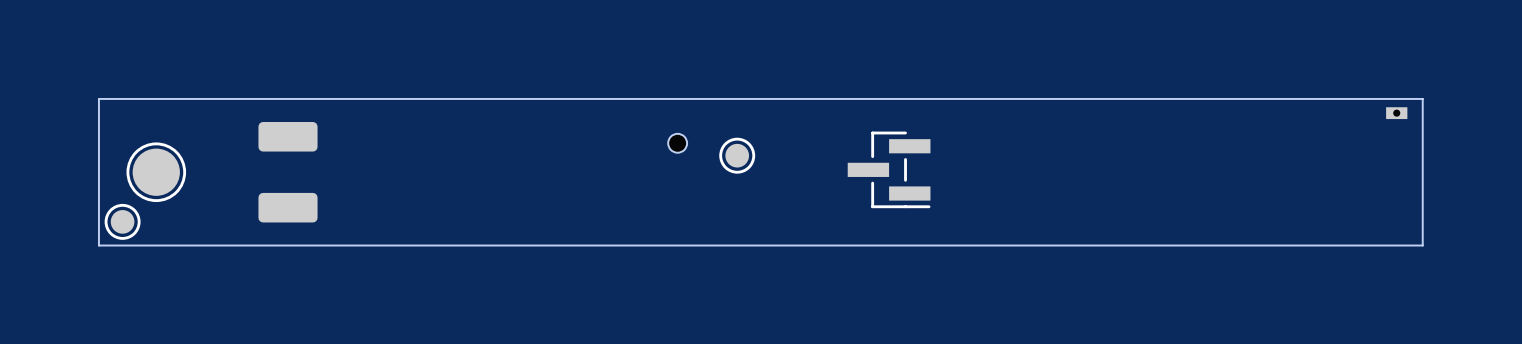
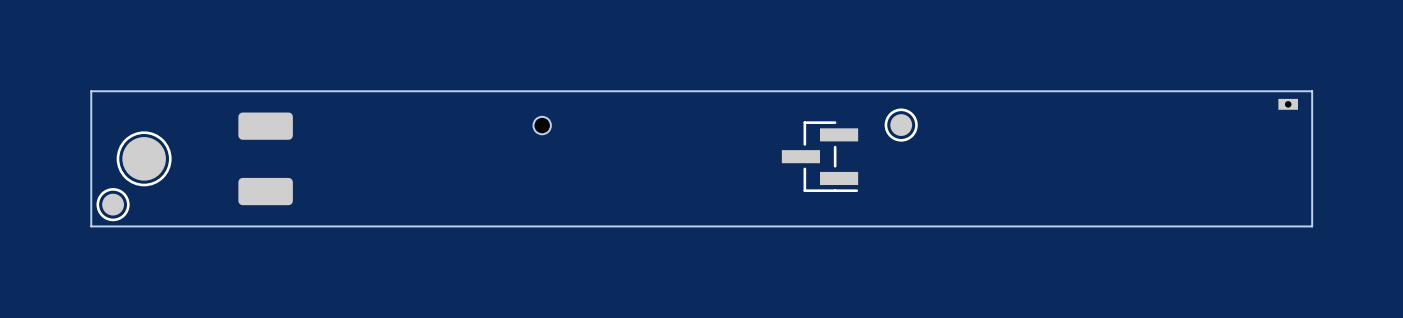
part position: (677, 143) -> (542, 125)
part position: (737, 155) -> (901, 125)

